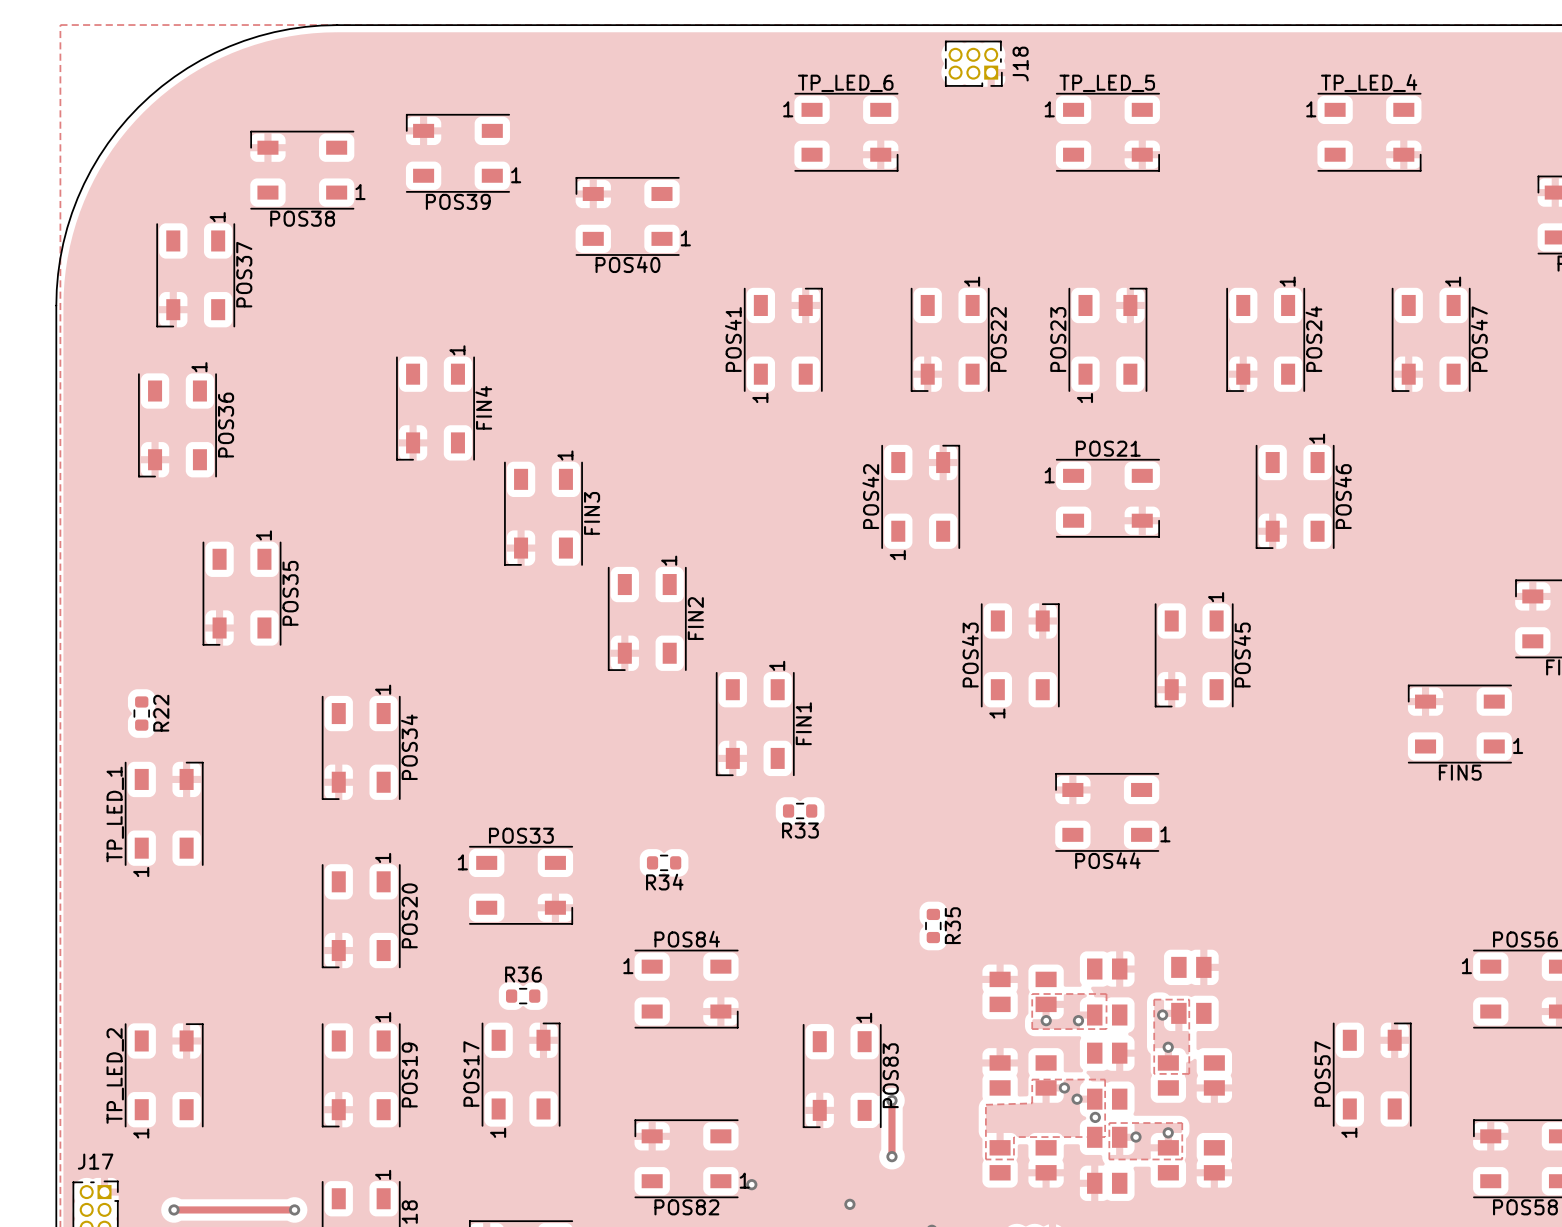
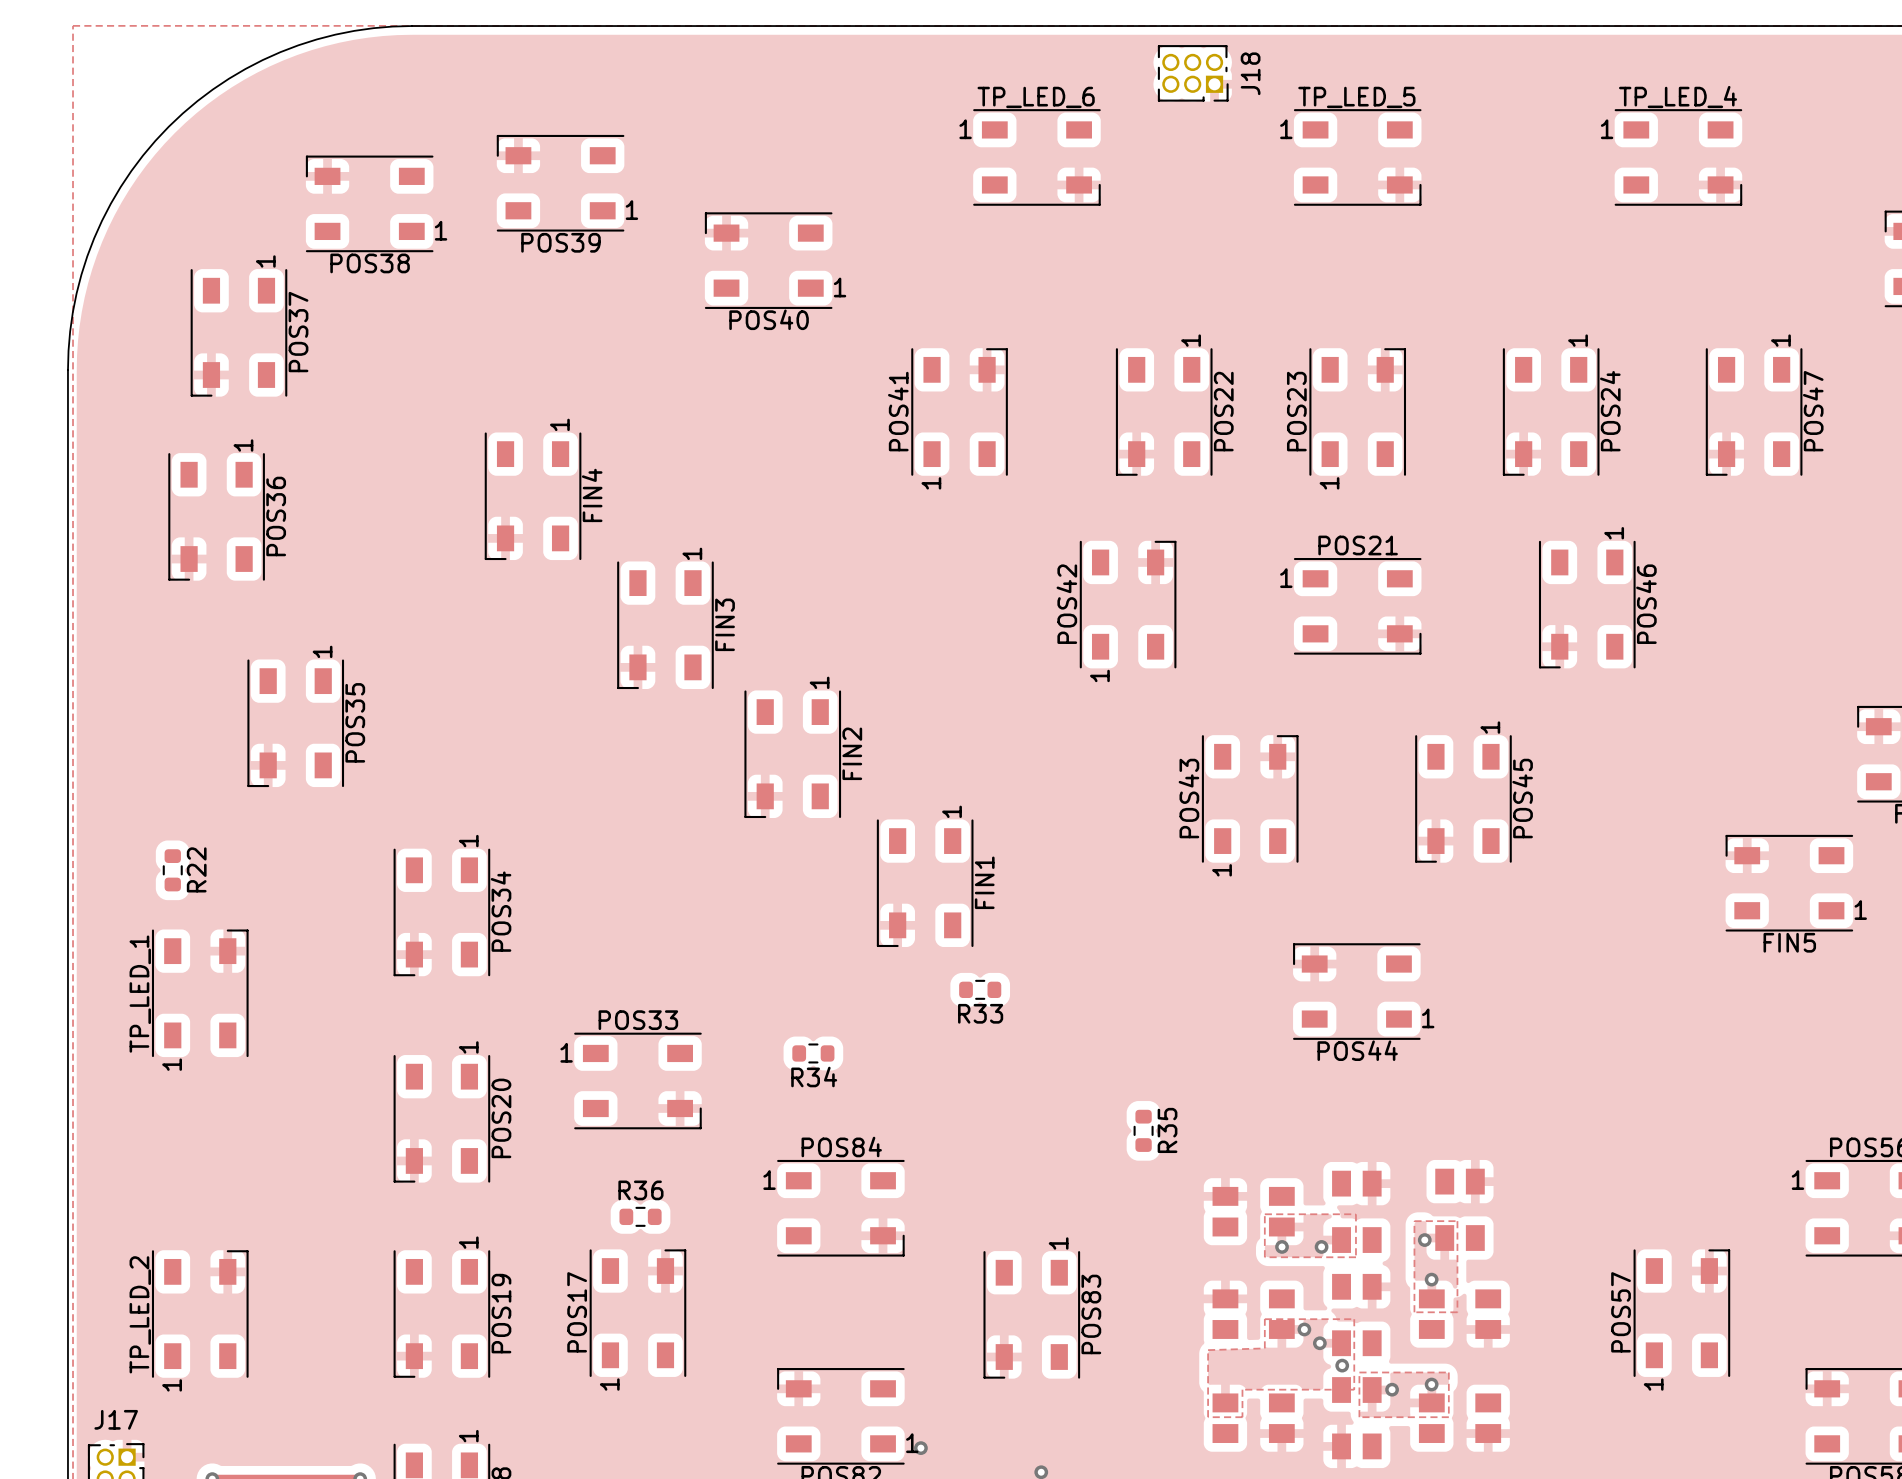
track: (891, 1100) (891, 1156) -> none
via: (891, 1100) -> none
via: (891, 1156) -> none

